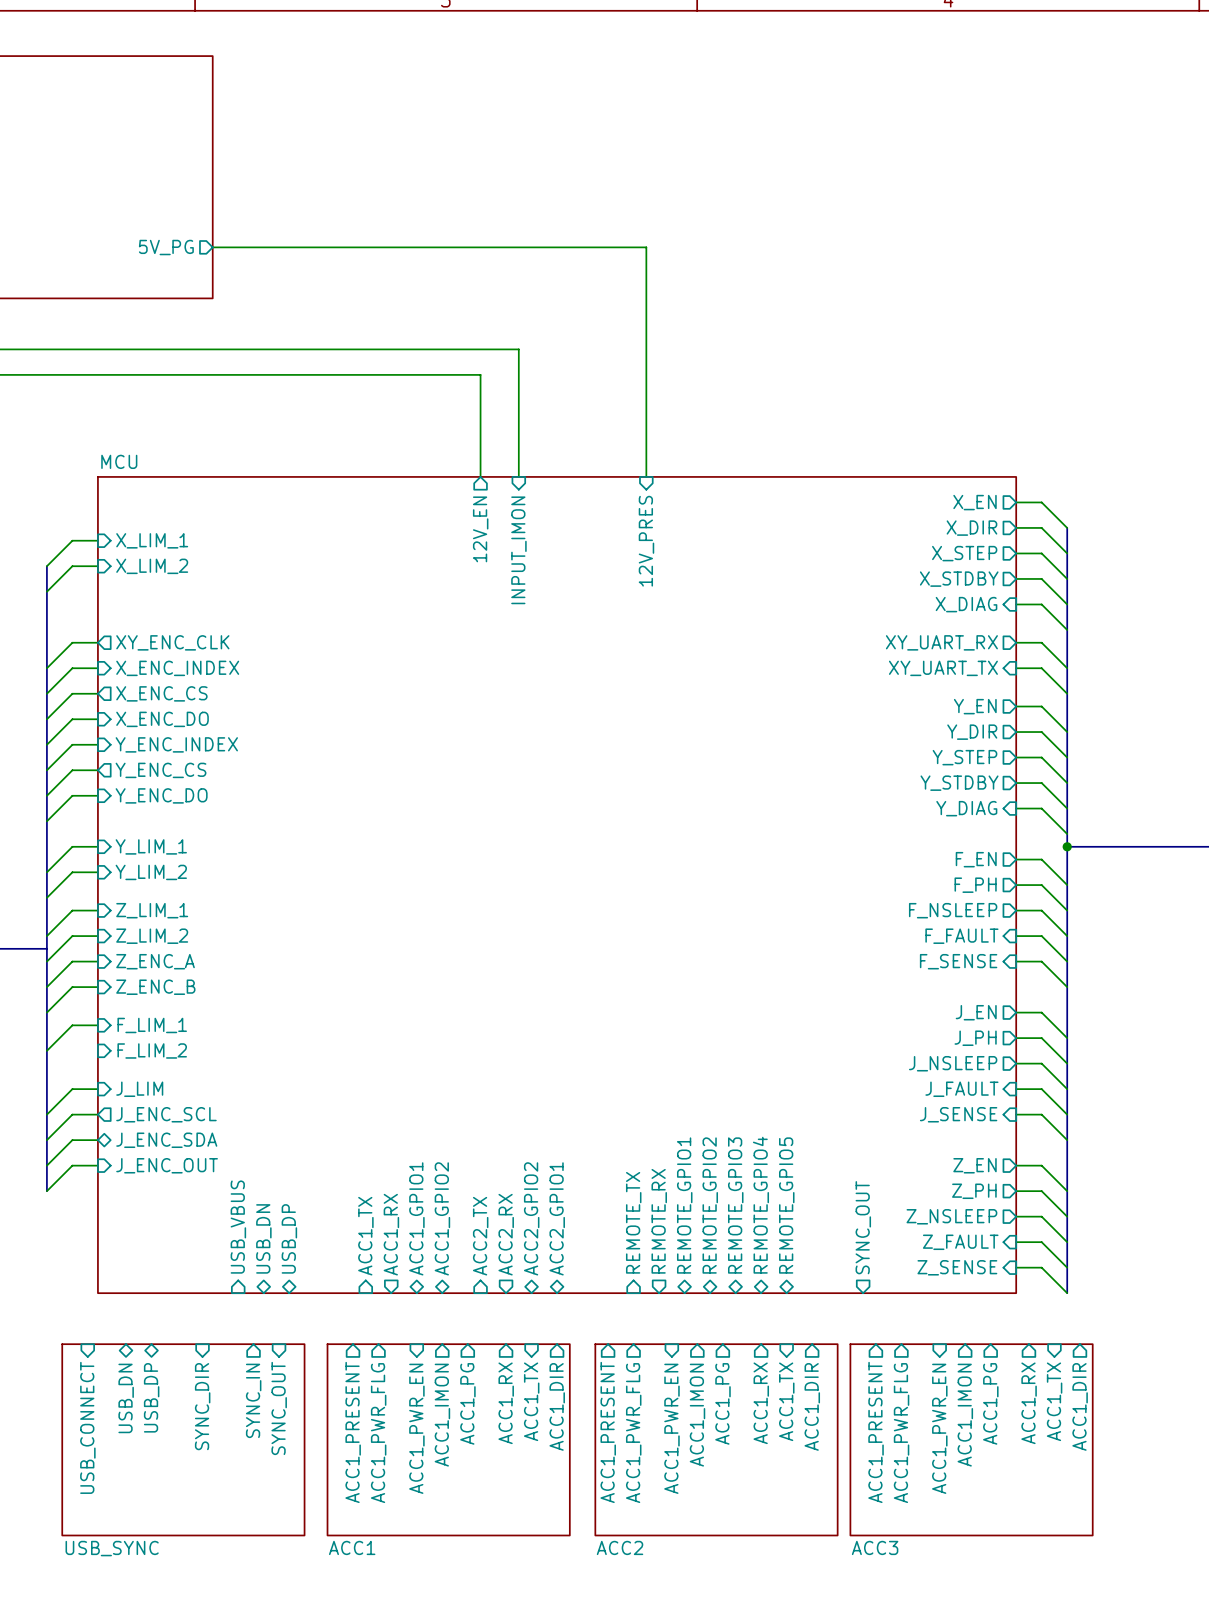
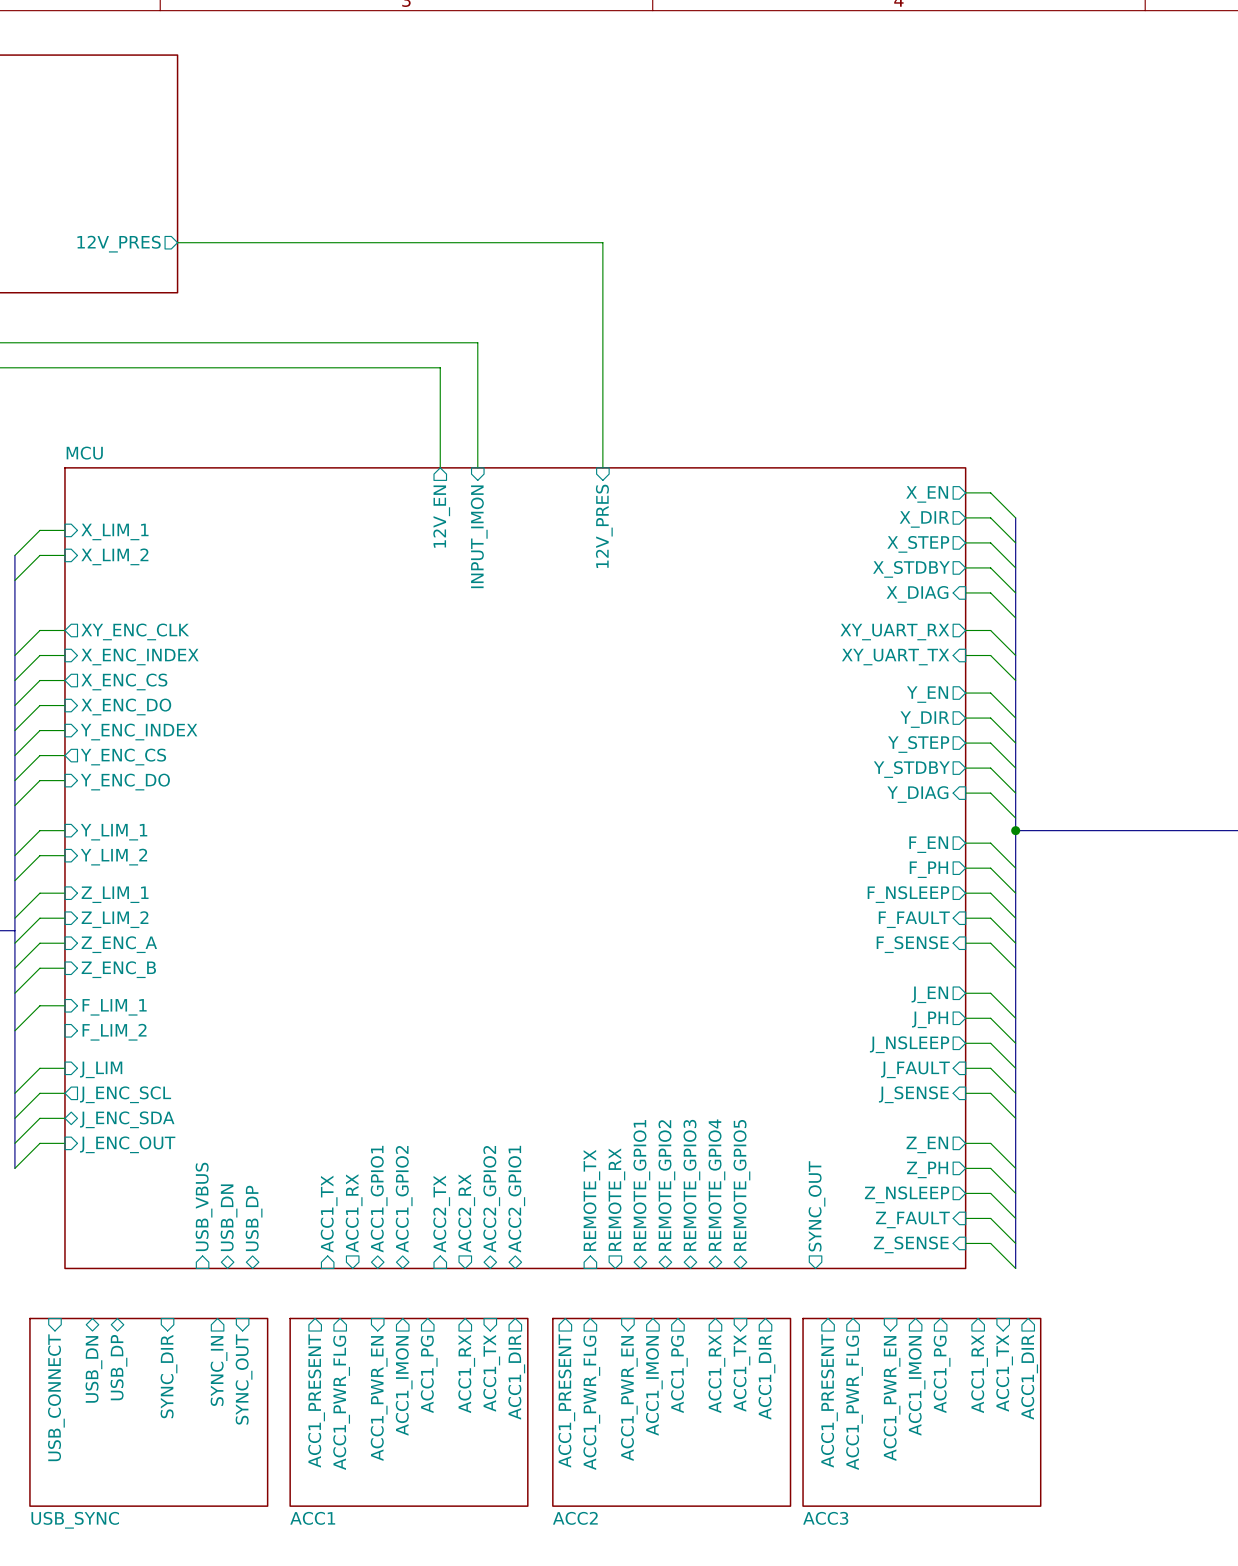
sheet pin: 5V_PG (166, 247) -> 12V_PRES (119, 244)

